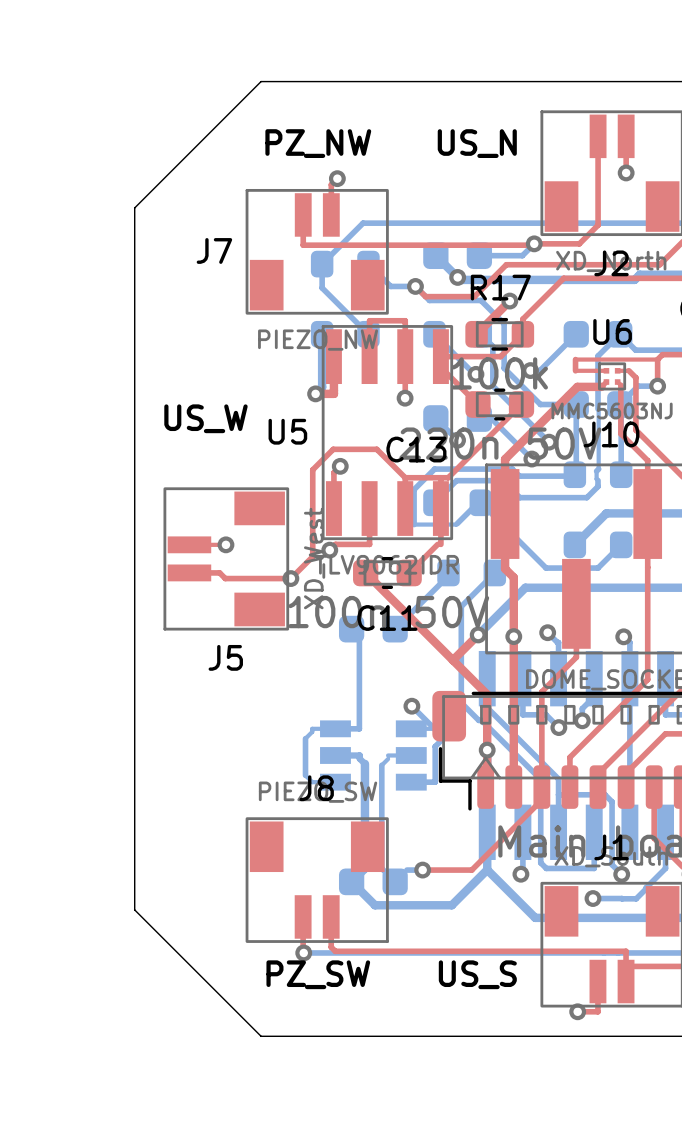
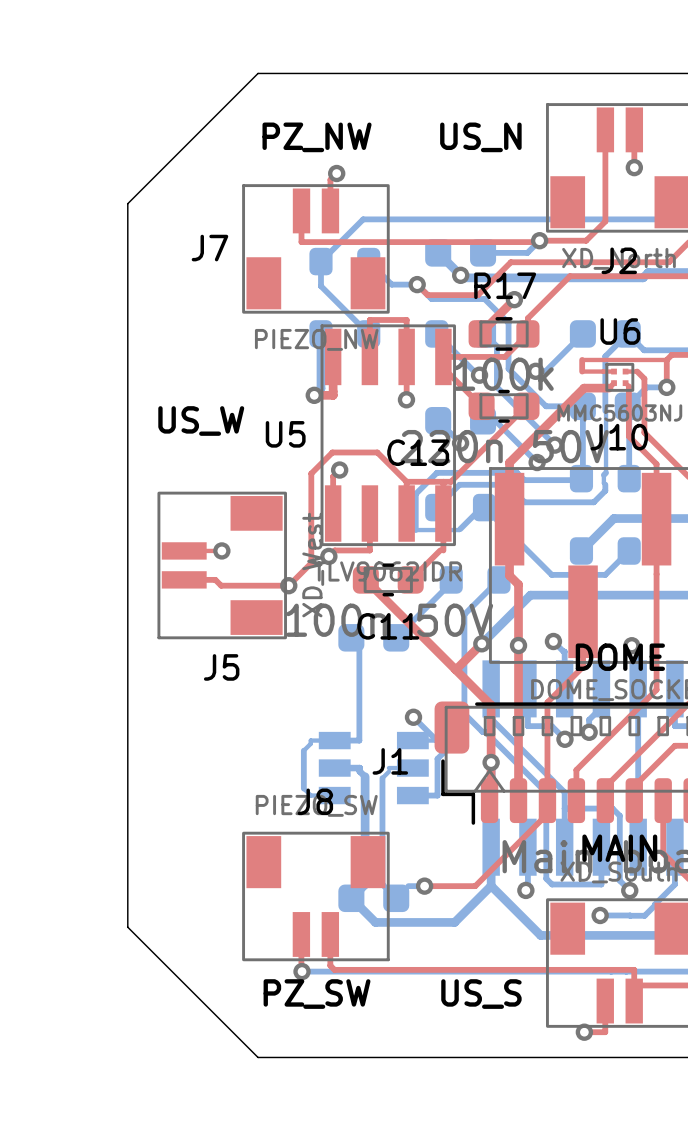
text: none -> DOME (620, 657)
text: none -> MAIN (619, 848)
J1 name position: J1 (611, 847) -> J1 (390, 761)

